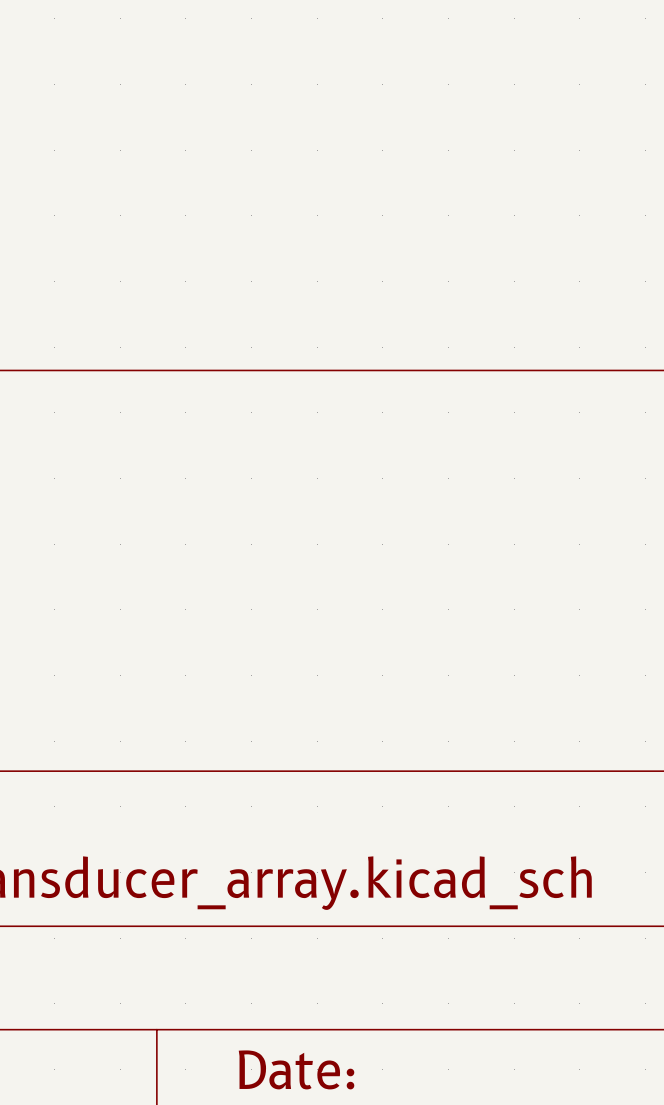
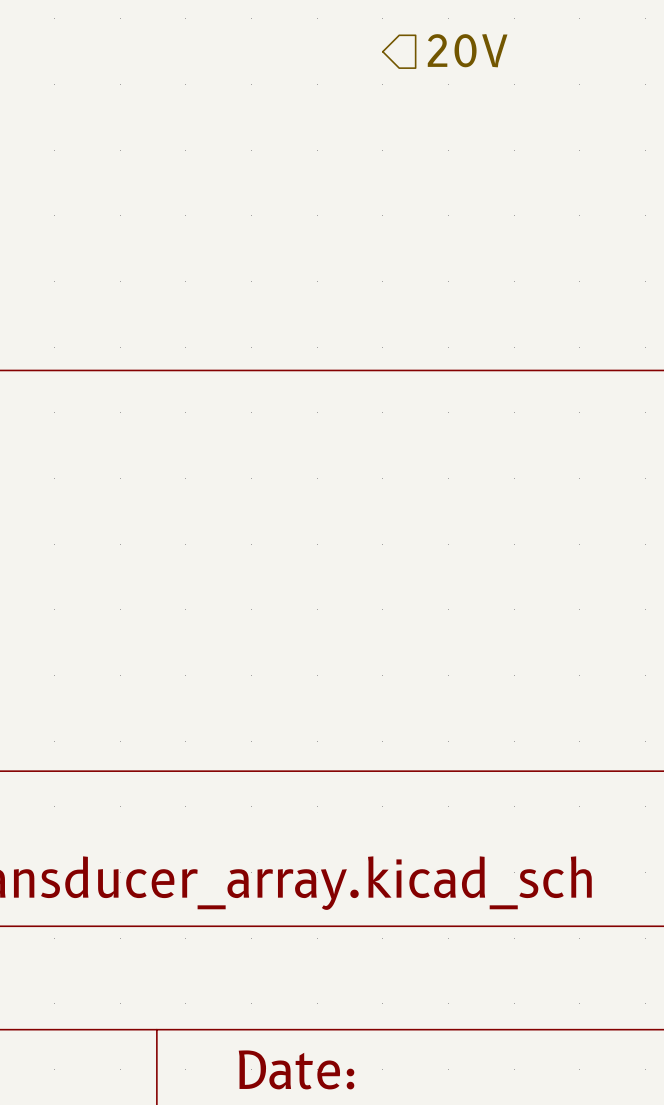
hierarchical label: none -> 20V (467, 50)

